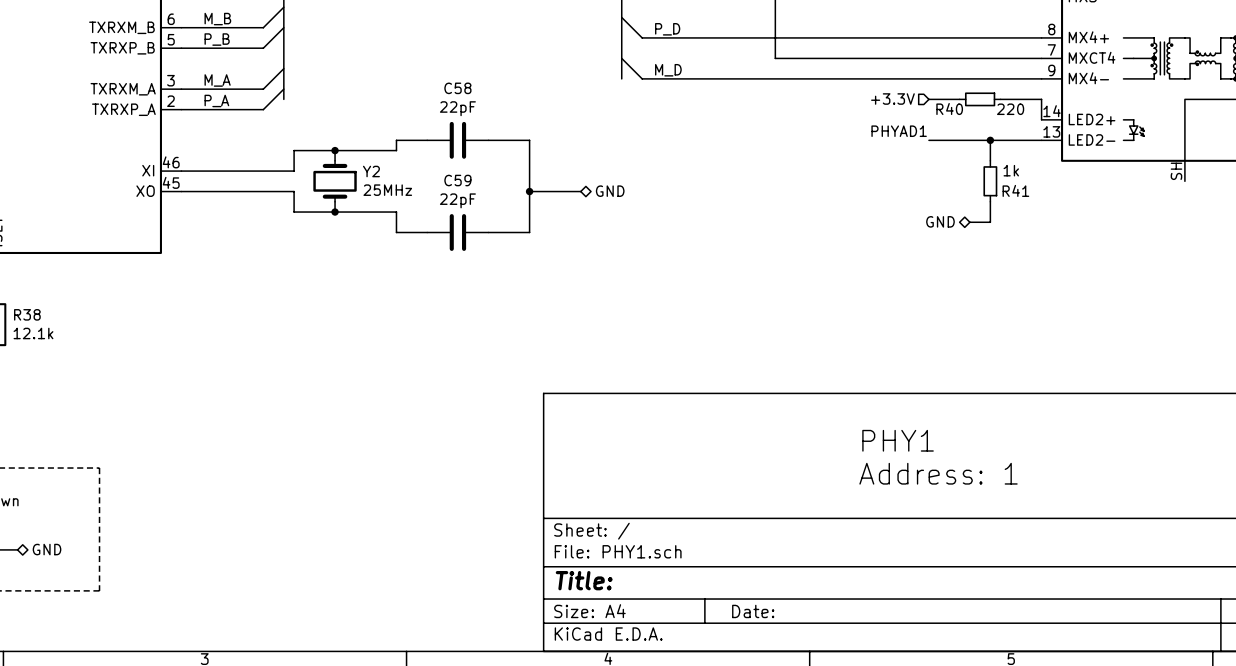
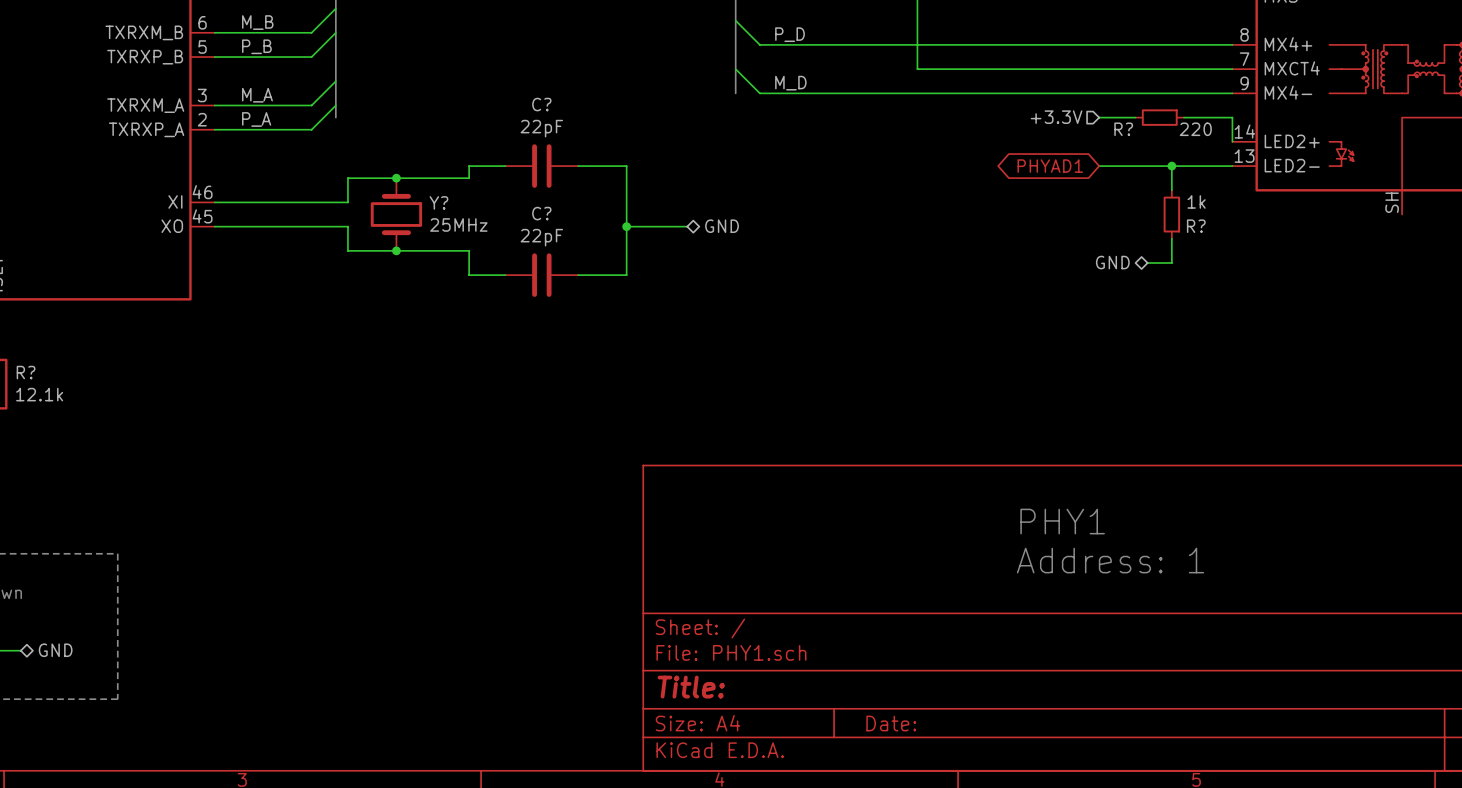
C58 name: C58 (457, 88) -> C? (541, 104)
R40 name: R40 (949, 109) -> R? (1123, 129)
label: PHYAD1 (899, 131) -> none
global label: none -> PHYAD1 (1050, 166)
Y2 name: Y2 (371, 171) -> Y? (438, 202)
C59 name: C59 (457, 180) -> C? (541, 213)
R41 name: R41 (1015, 190) -> R? (1196, 226)
R38 name: R38 (27, 314) -> R? (26, 372)

